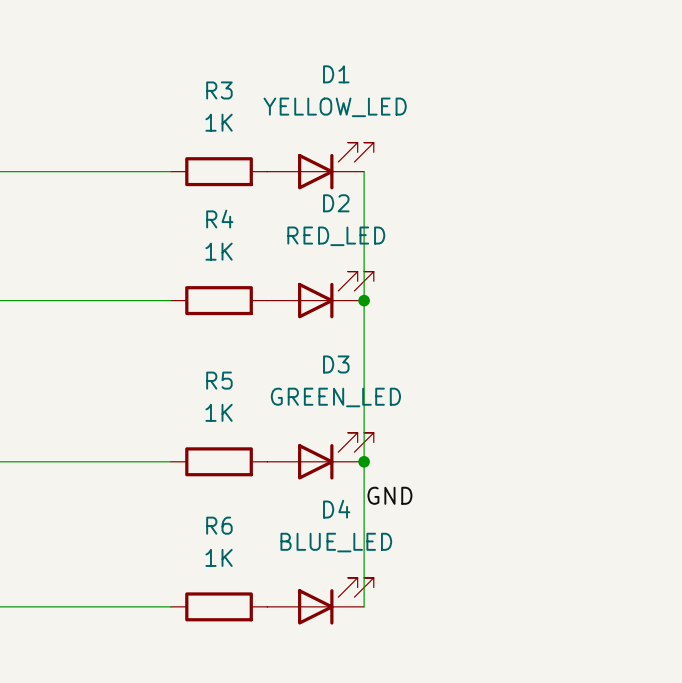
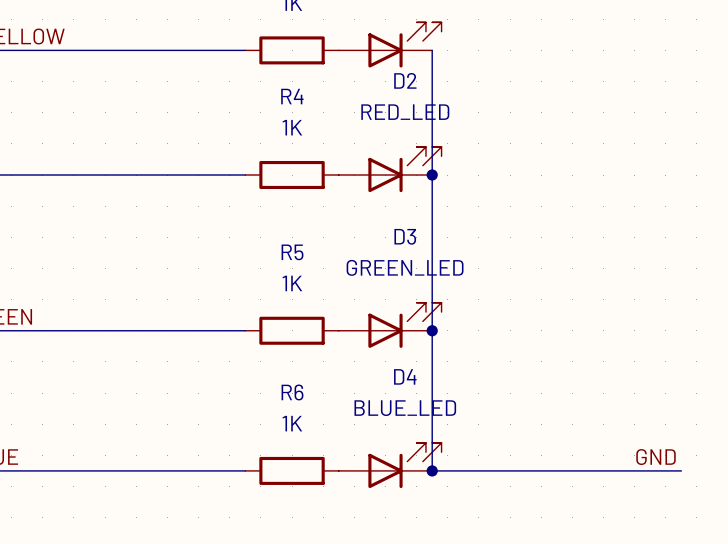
label position: GND (389, 495) -> GND (656, 457)
wire: none -> (432, 470) (681, 470)
junction: none -> (432, 470)

